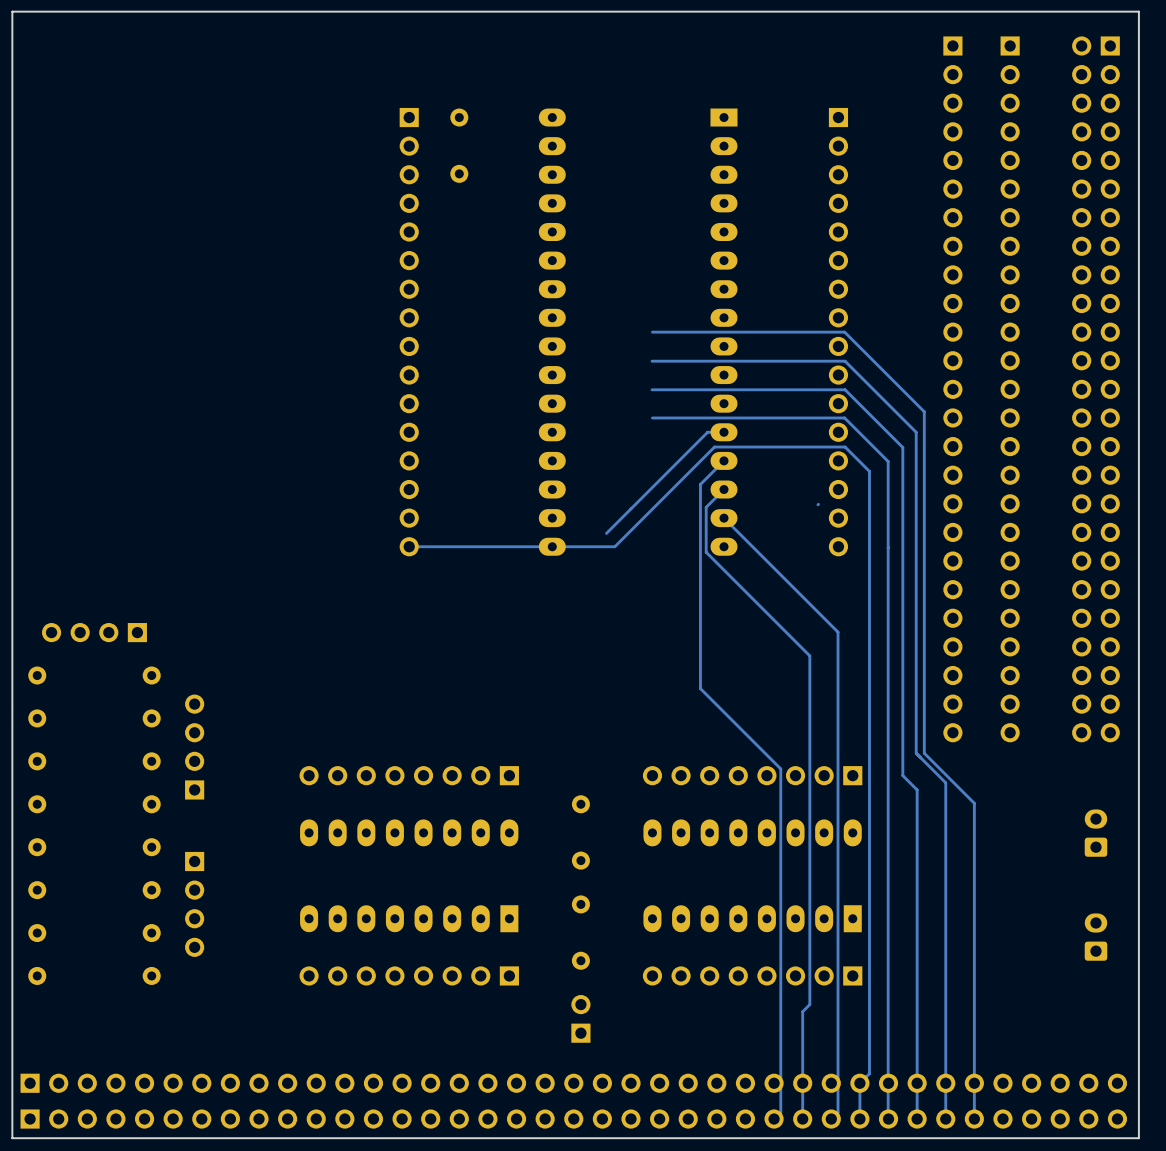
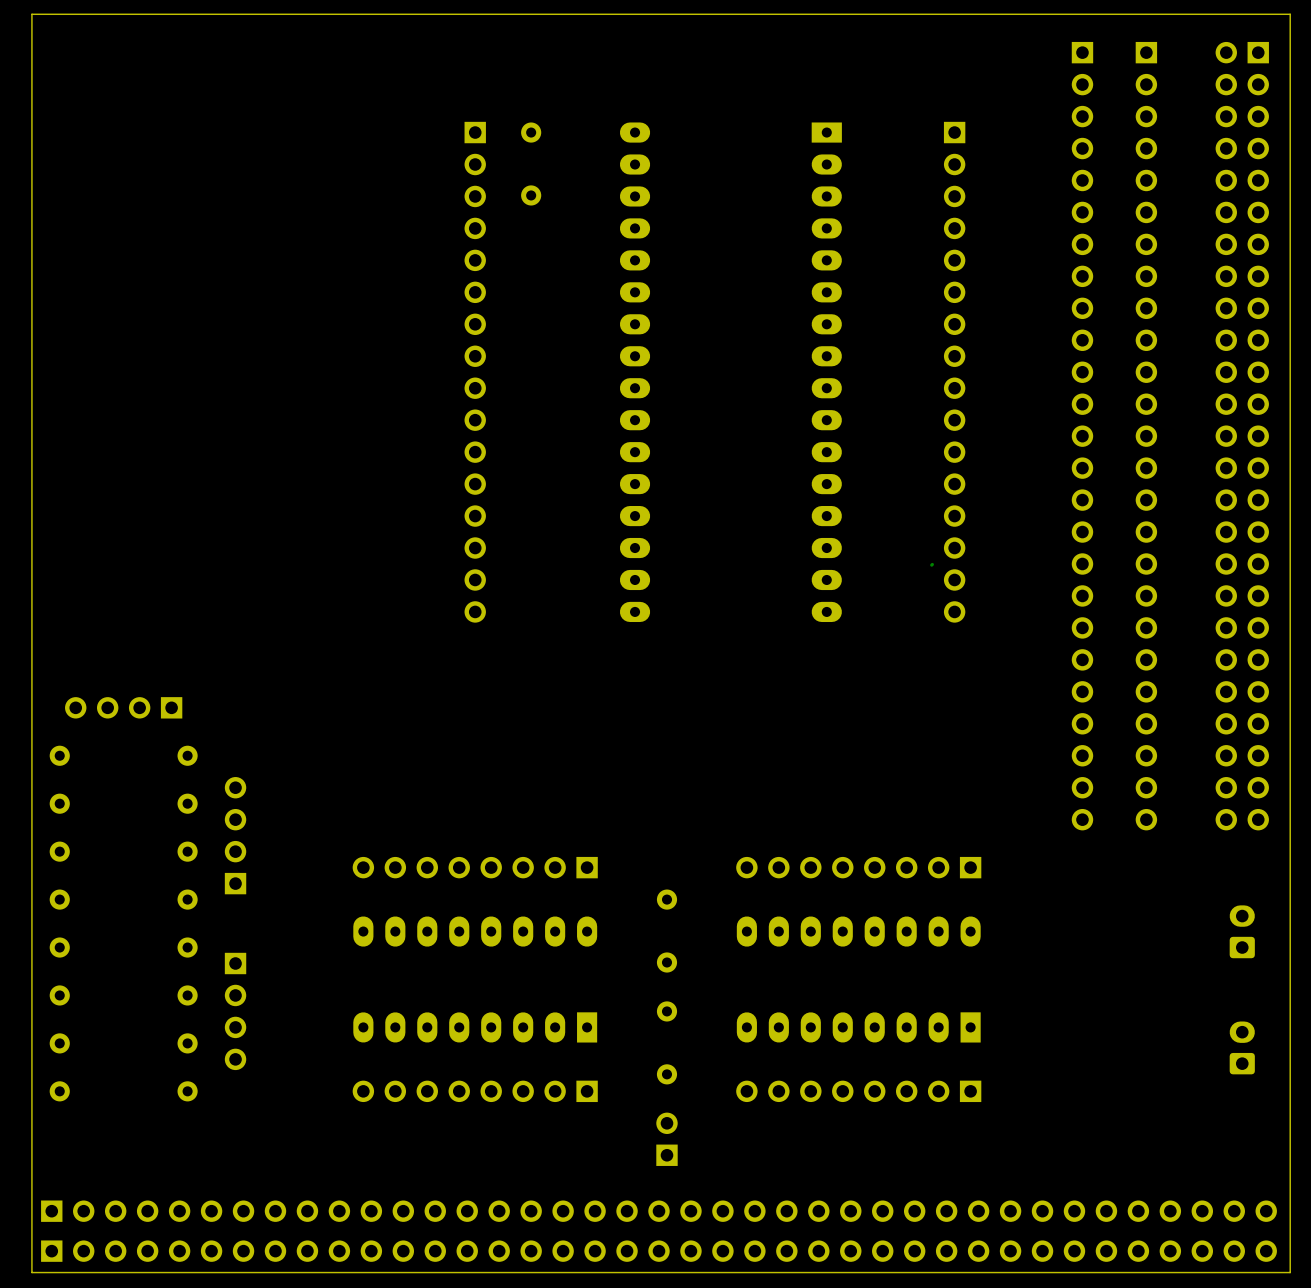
track: (652, 332) (844, 332) (924, 411) (924, 753) (974, 803) (974, 1119) -> none
track: (652, 361) (845, 361) (916, 432) (916, 753) (945, 782) (945, 1119) -> none
track: (652, 389) (845, 389) (902, 447) (902, 775) (917, 789) (917, 1119) -> none
track: (652, 417) (844, 417) (888, 461) (888, 1119) -> none
track: (723, 432) (707, 432) (606, 533) -> none
track: (723, 460) (700, 484) (700, 688) (780, 768) (780, 1112) (774, 1119) -> none
track: (723, 489) (706, 507) (706, 552) (809, 655) (809, 1004) (802, 1011) (802, 1119) -> none
track: (723, 518) (838, 632) (838, 1112) (831, 1119) -> none
track: (409, 546) (614, 546) (714, 447) (845, 447) (869, 471) (869, 1073) (859, 1083) (859, 1119) -> none

